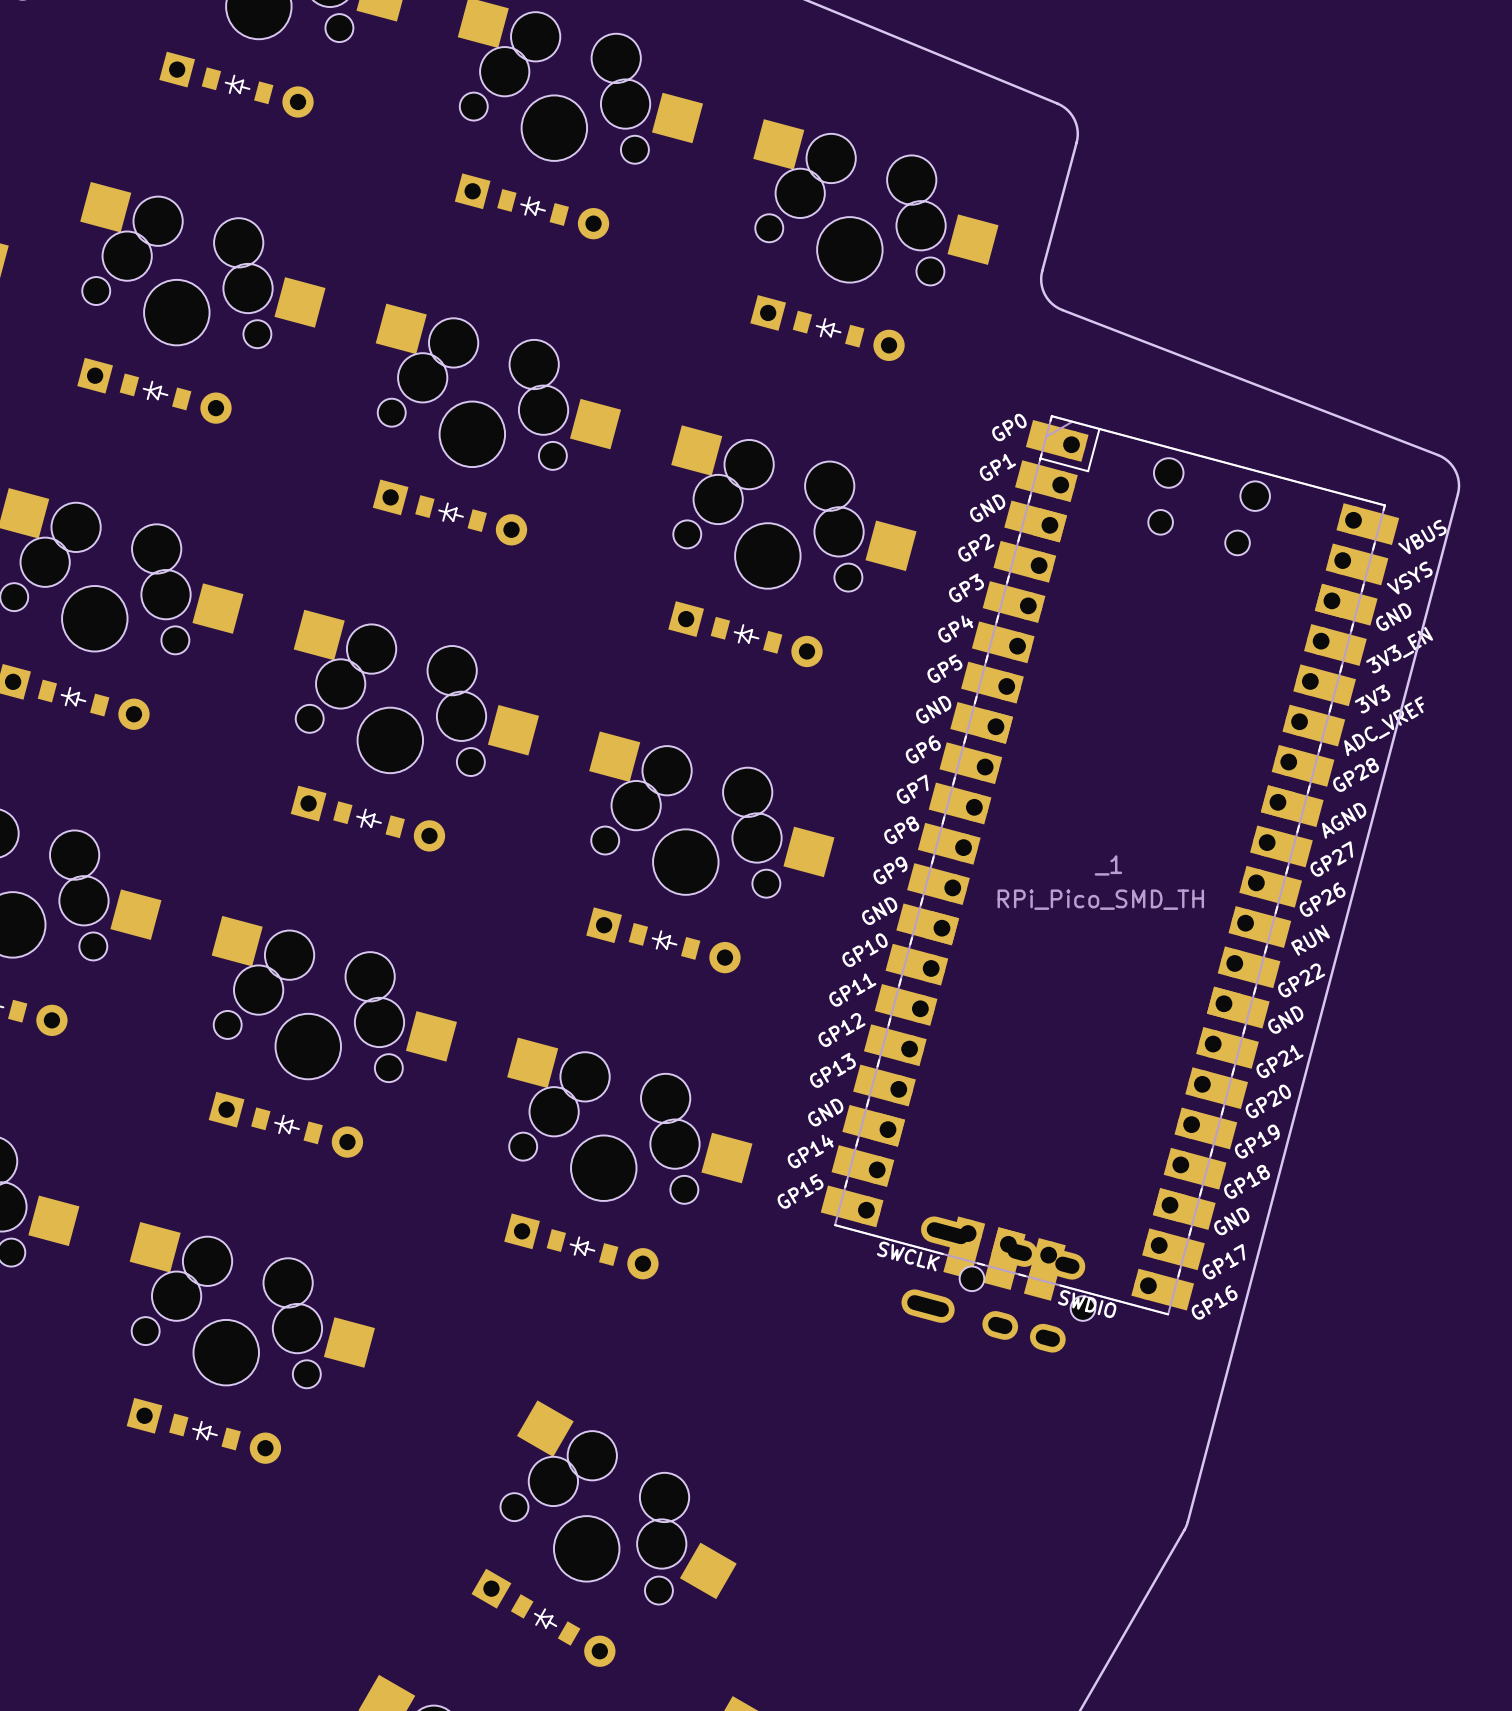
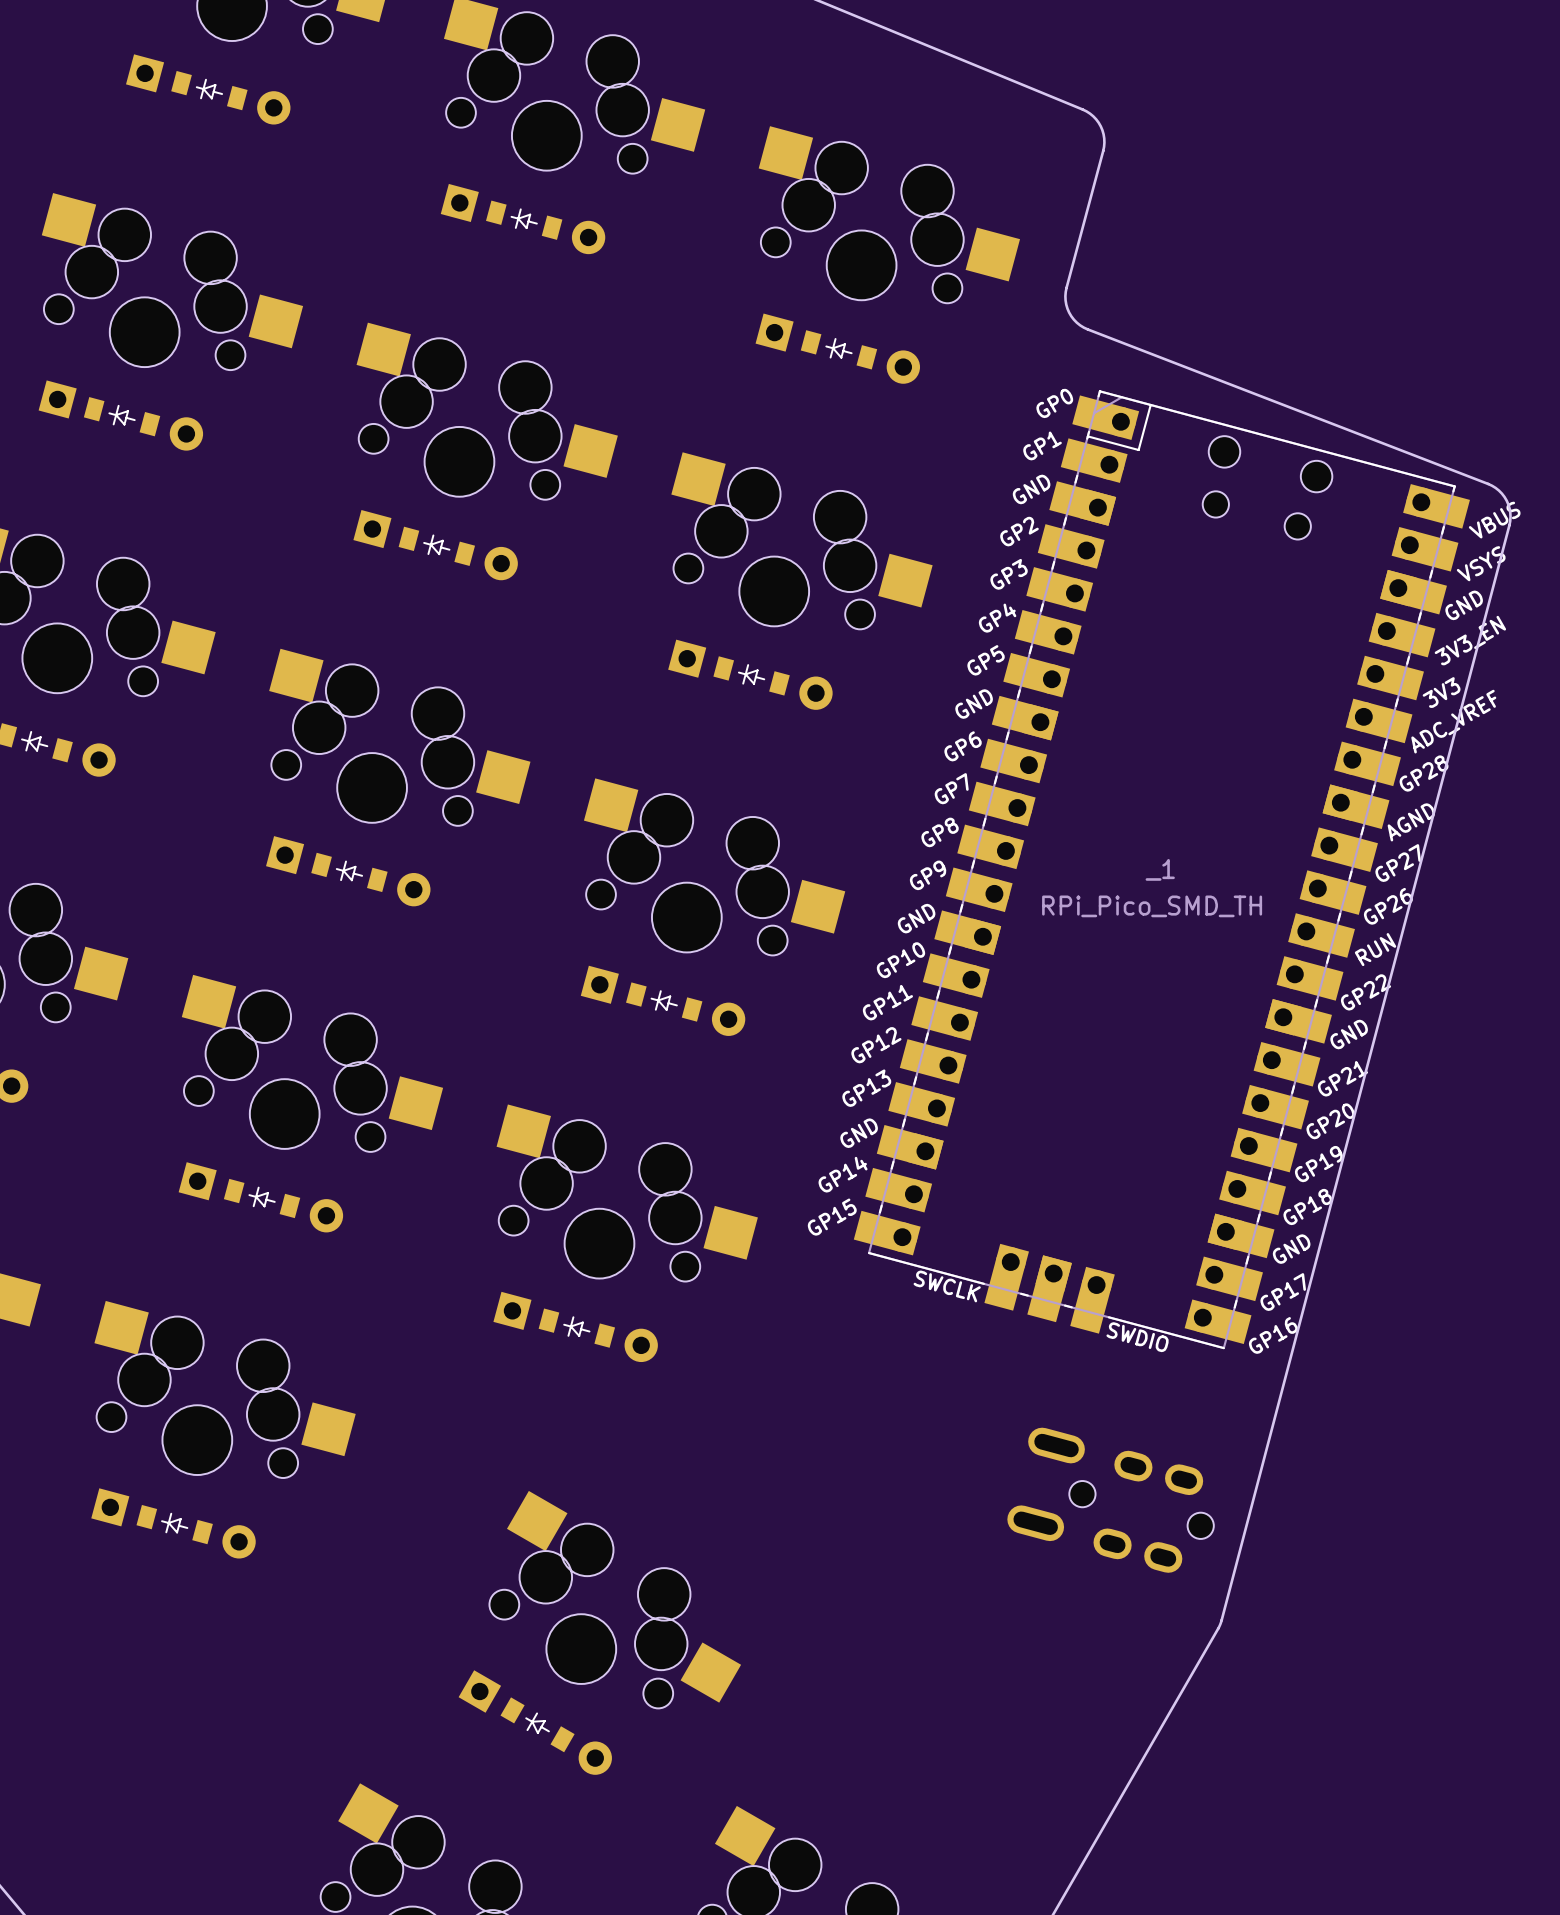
_1 position: (1109, 865) -> (1161, 869)
part position: (998, 1284) -> (1110, 1500)

